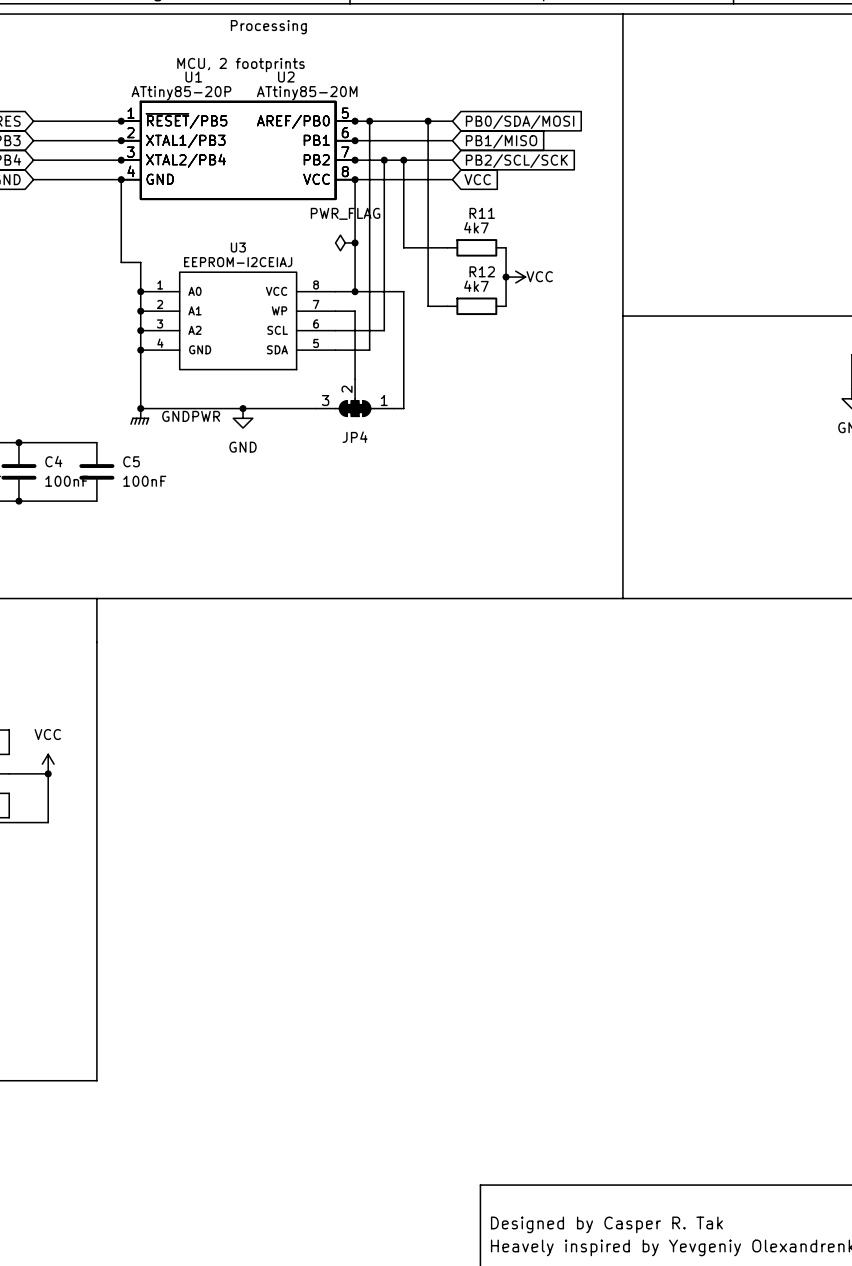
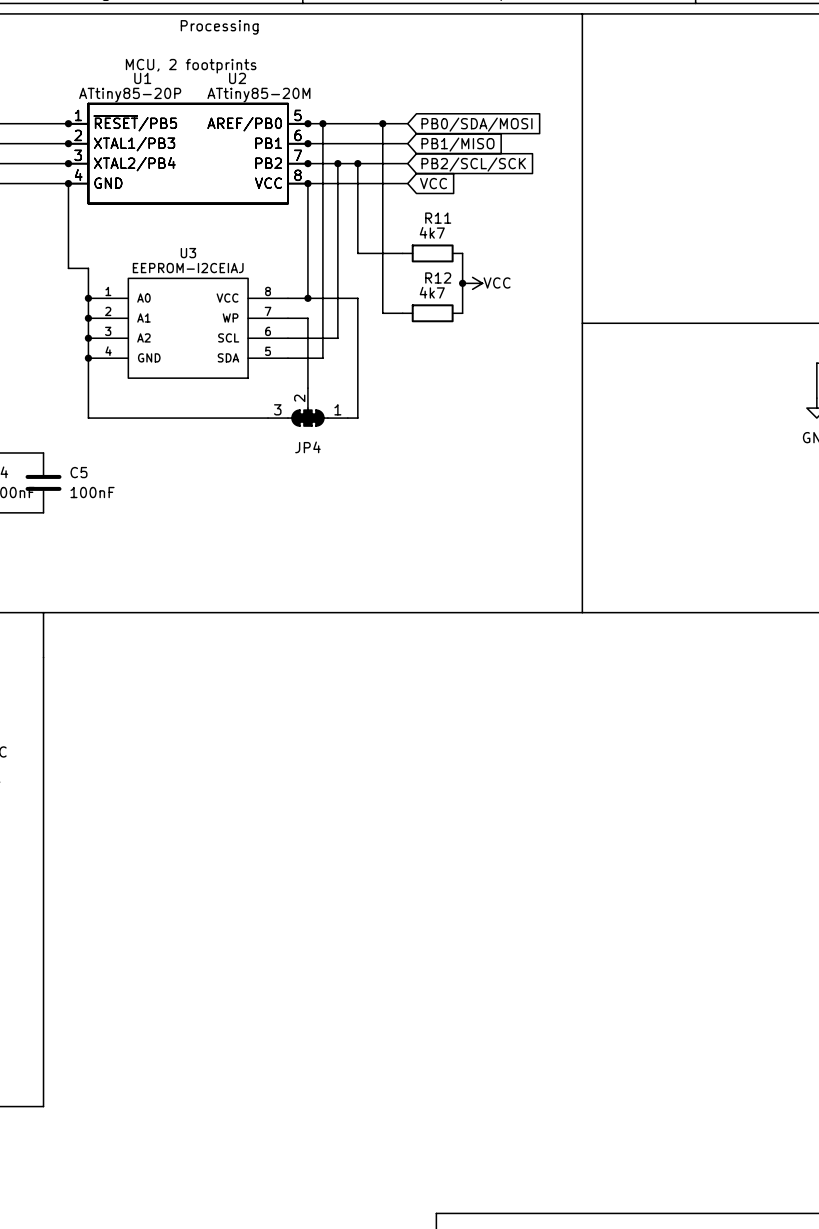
power symbol: PWR_FLAG (345, 242) -> none
junction: (355, 242) -> none
junction: (140, 408) -> none
junction: (243, 408) -> none
power symbol: GNDPWR (139, 416) -> none
power symbol: GND (243, 418) -> none

